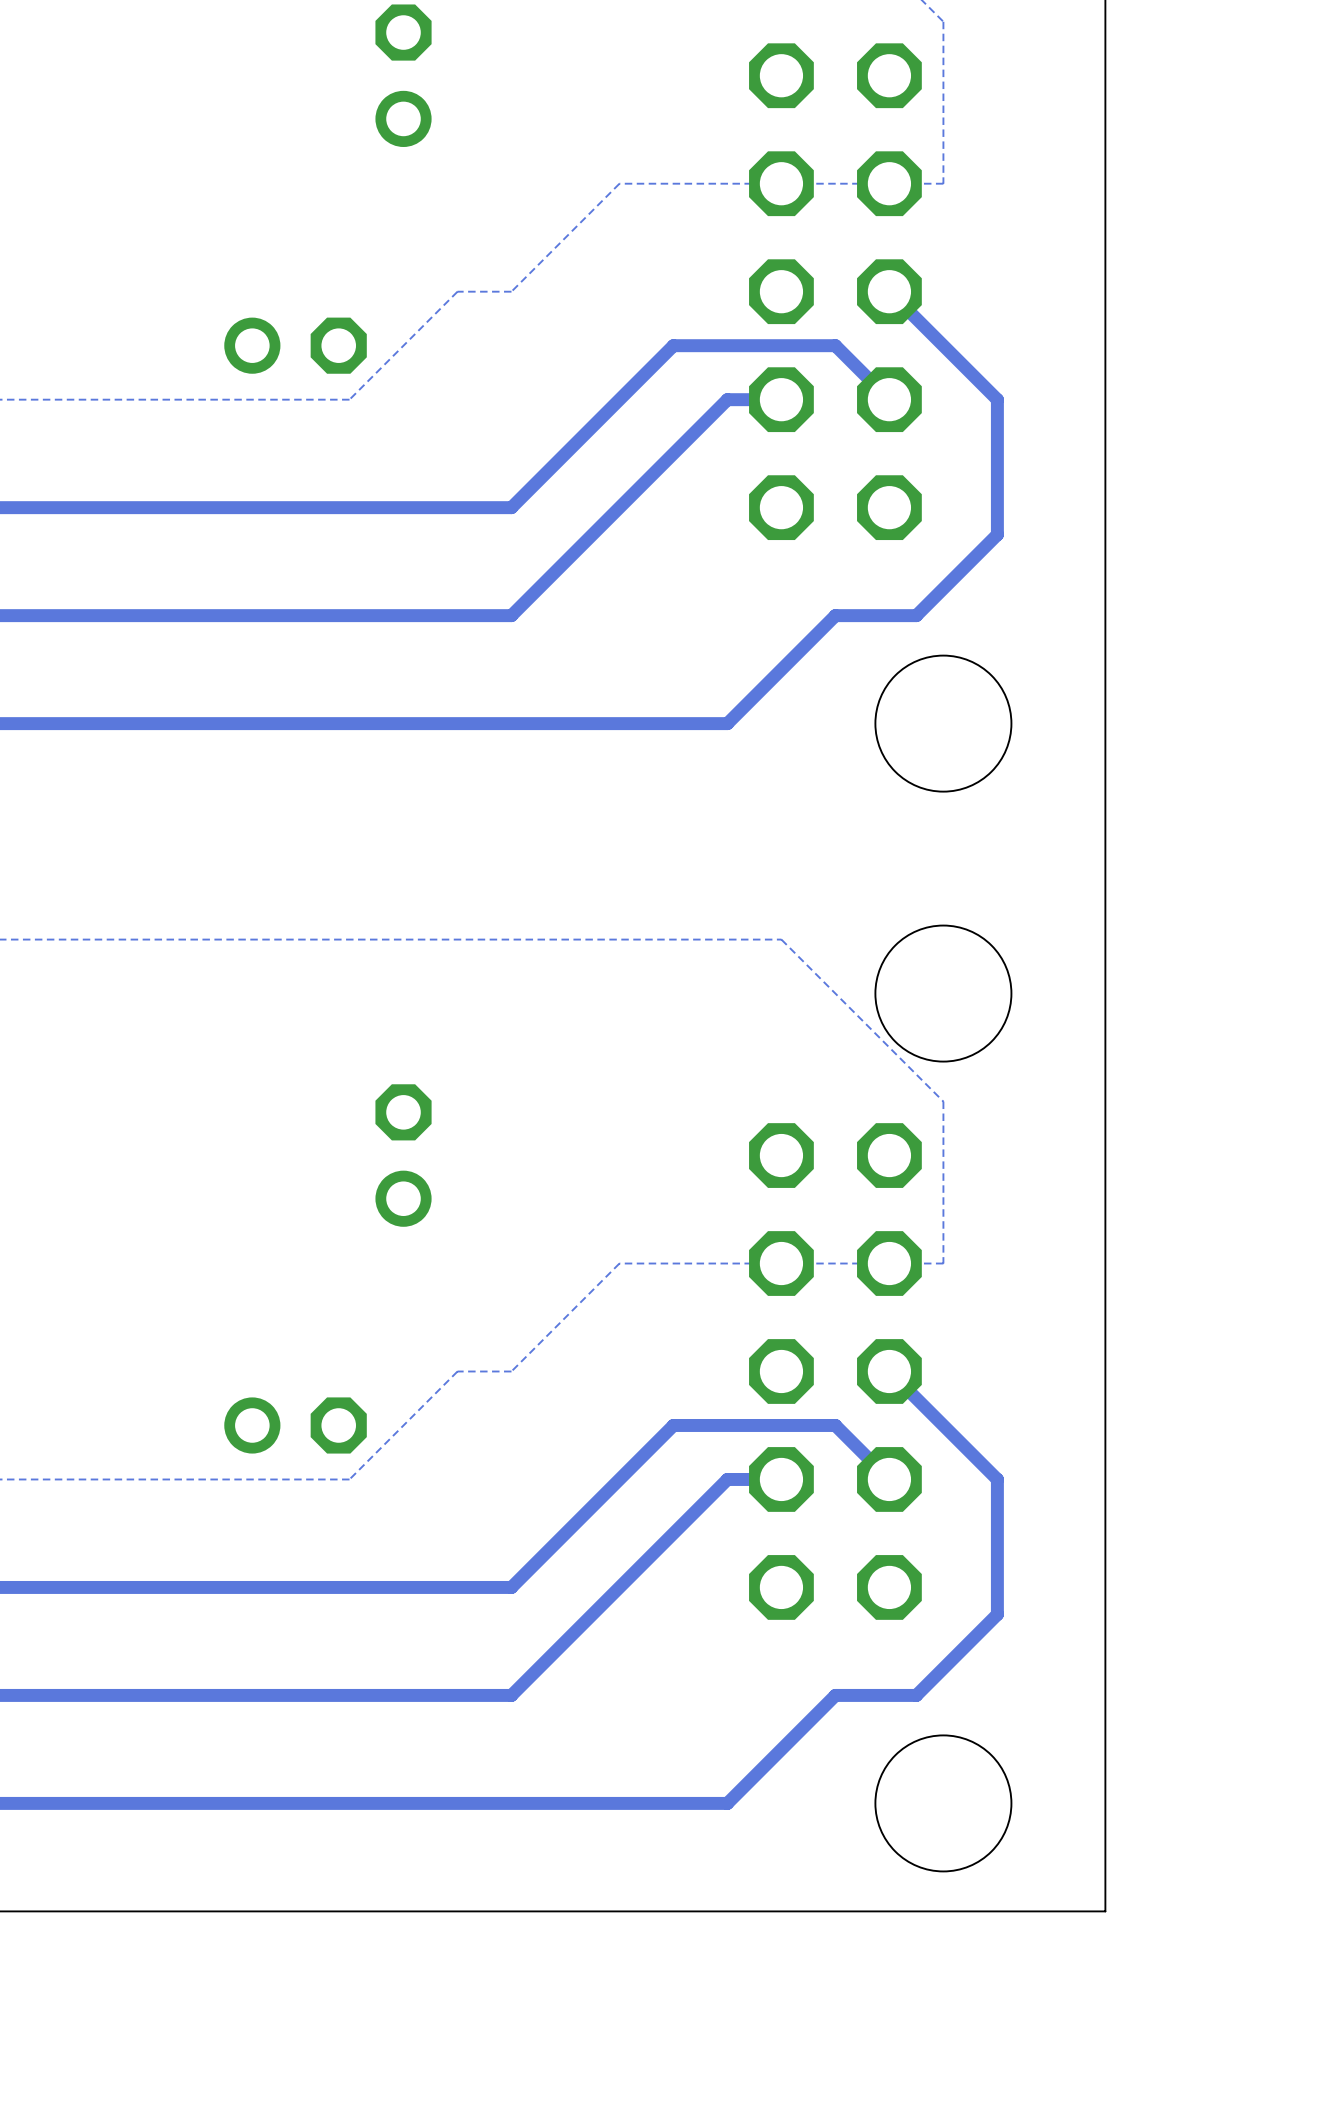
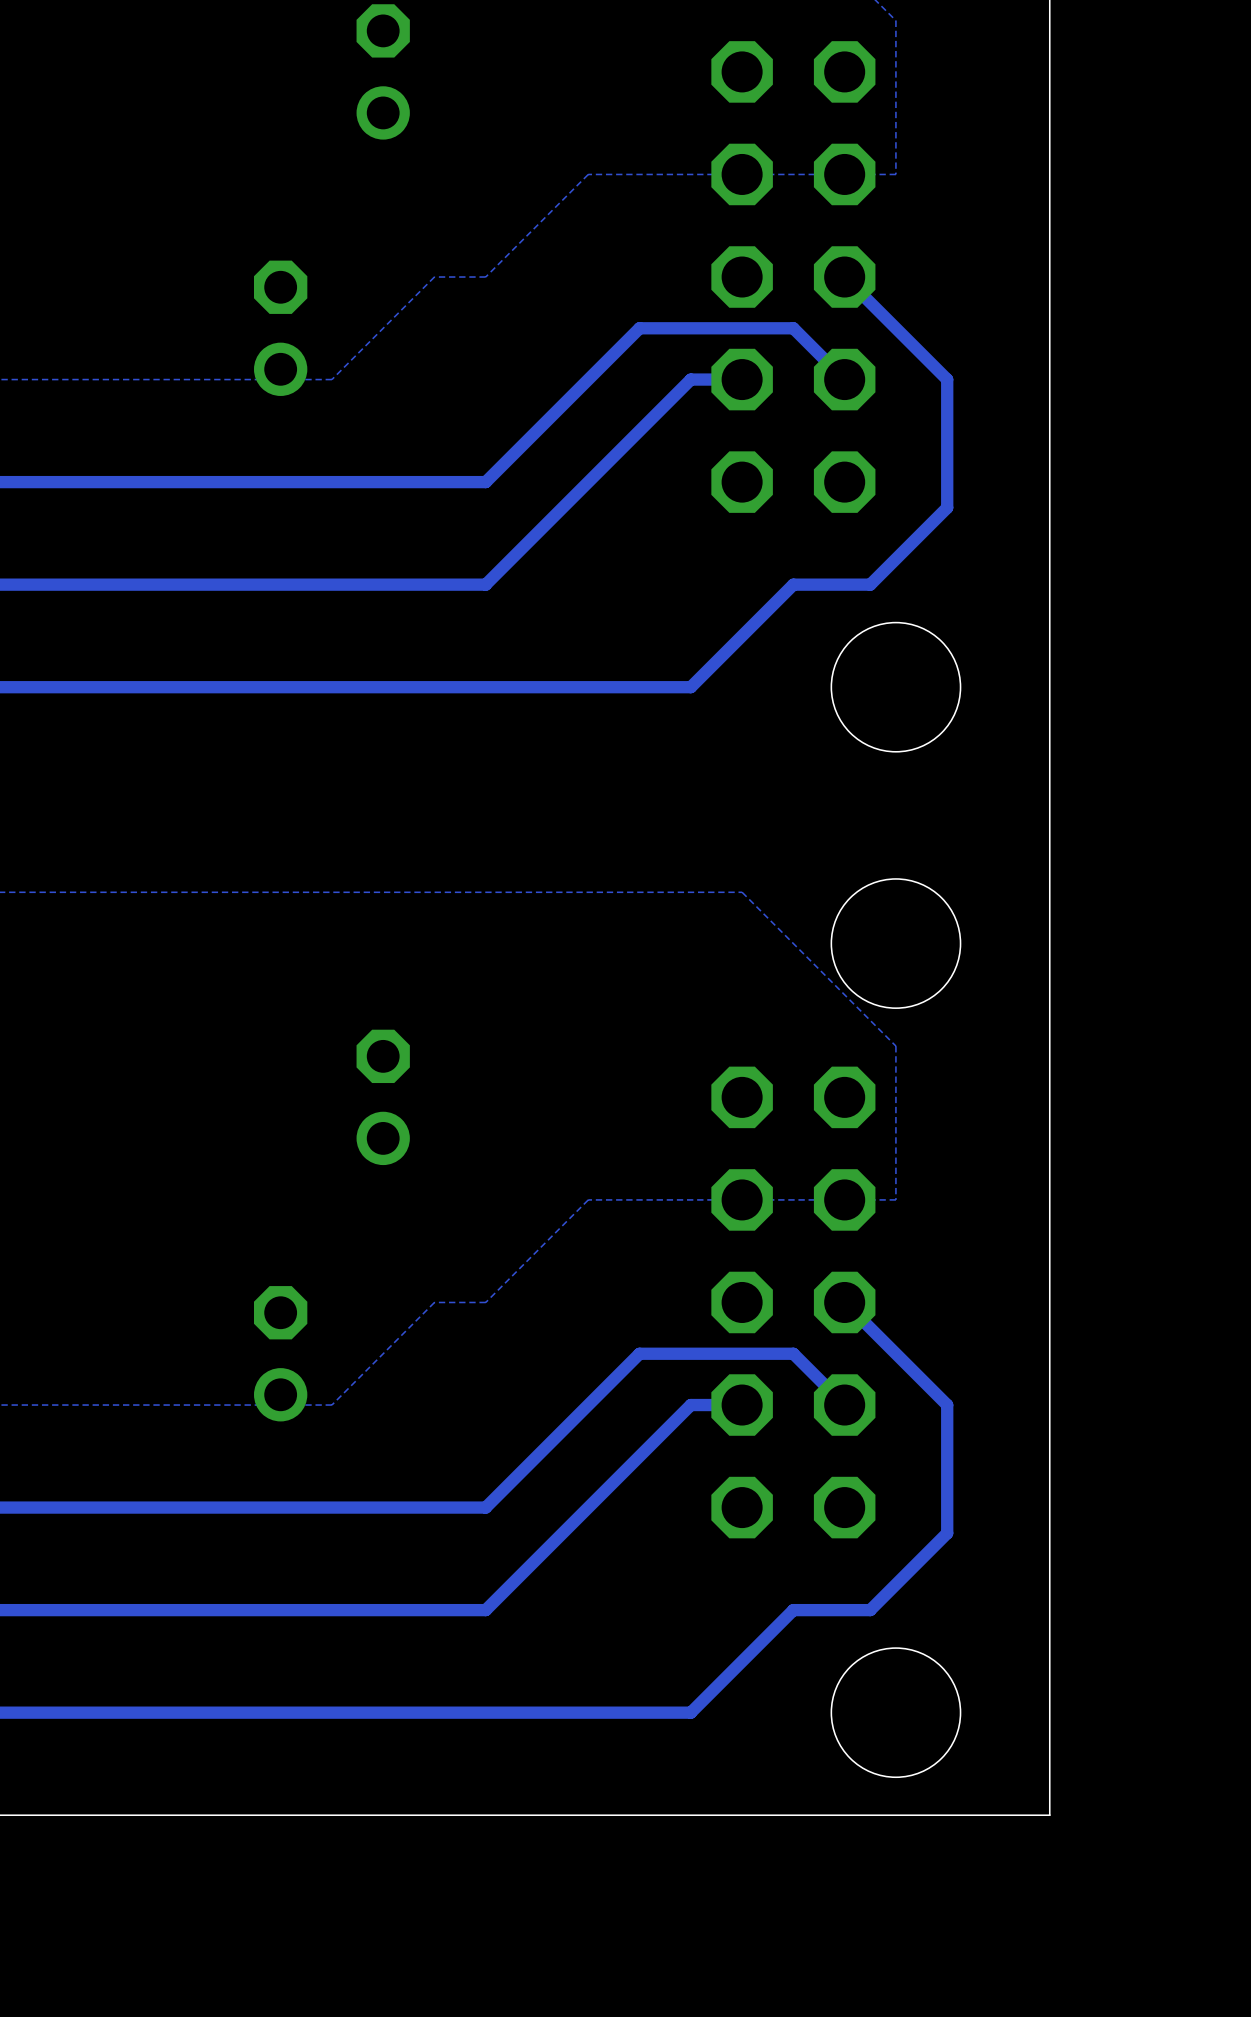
part rotation: 0° (295, 345) -> 90° counterclockwise (280, 328)
part rotation: 0° (295, 1425) -> 90° counterclockwise (280, 1353)

